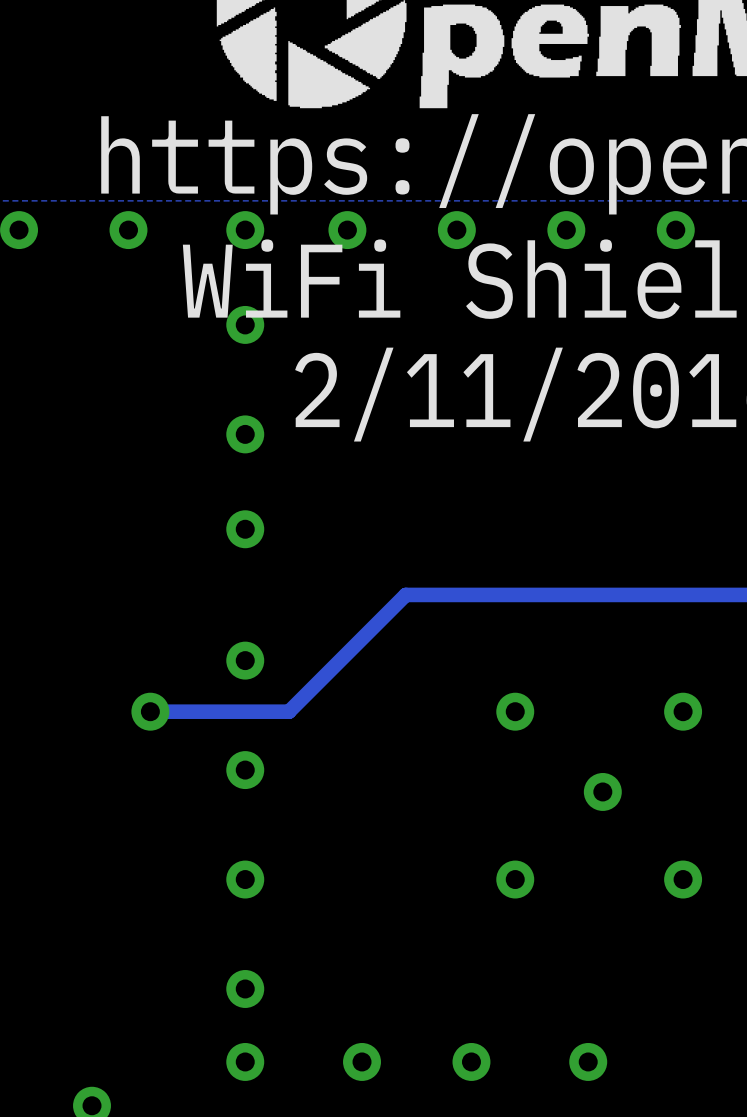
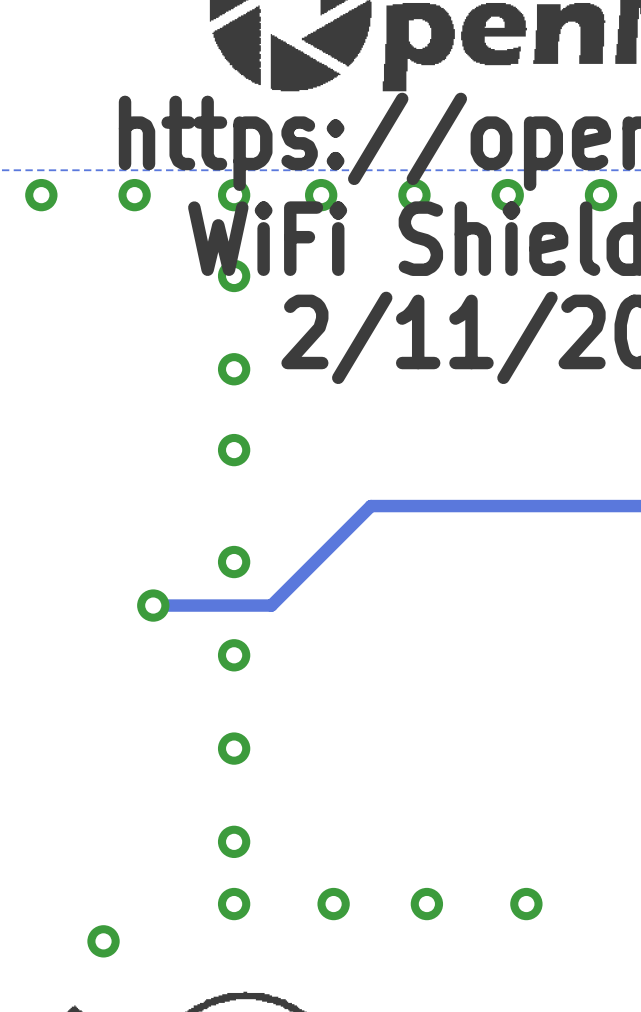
via: (515, 711) -> none
via: (683, 711) -> none
via: (602, 791) -> none
via: (515, 879) -> none
via: (683, 879) -> none

